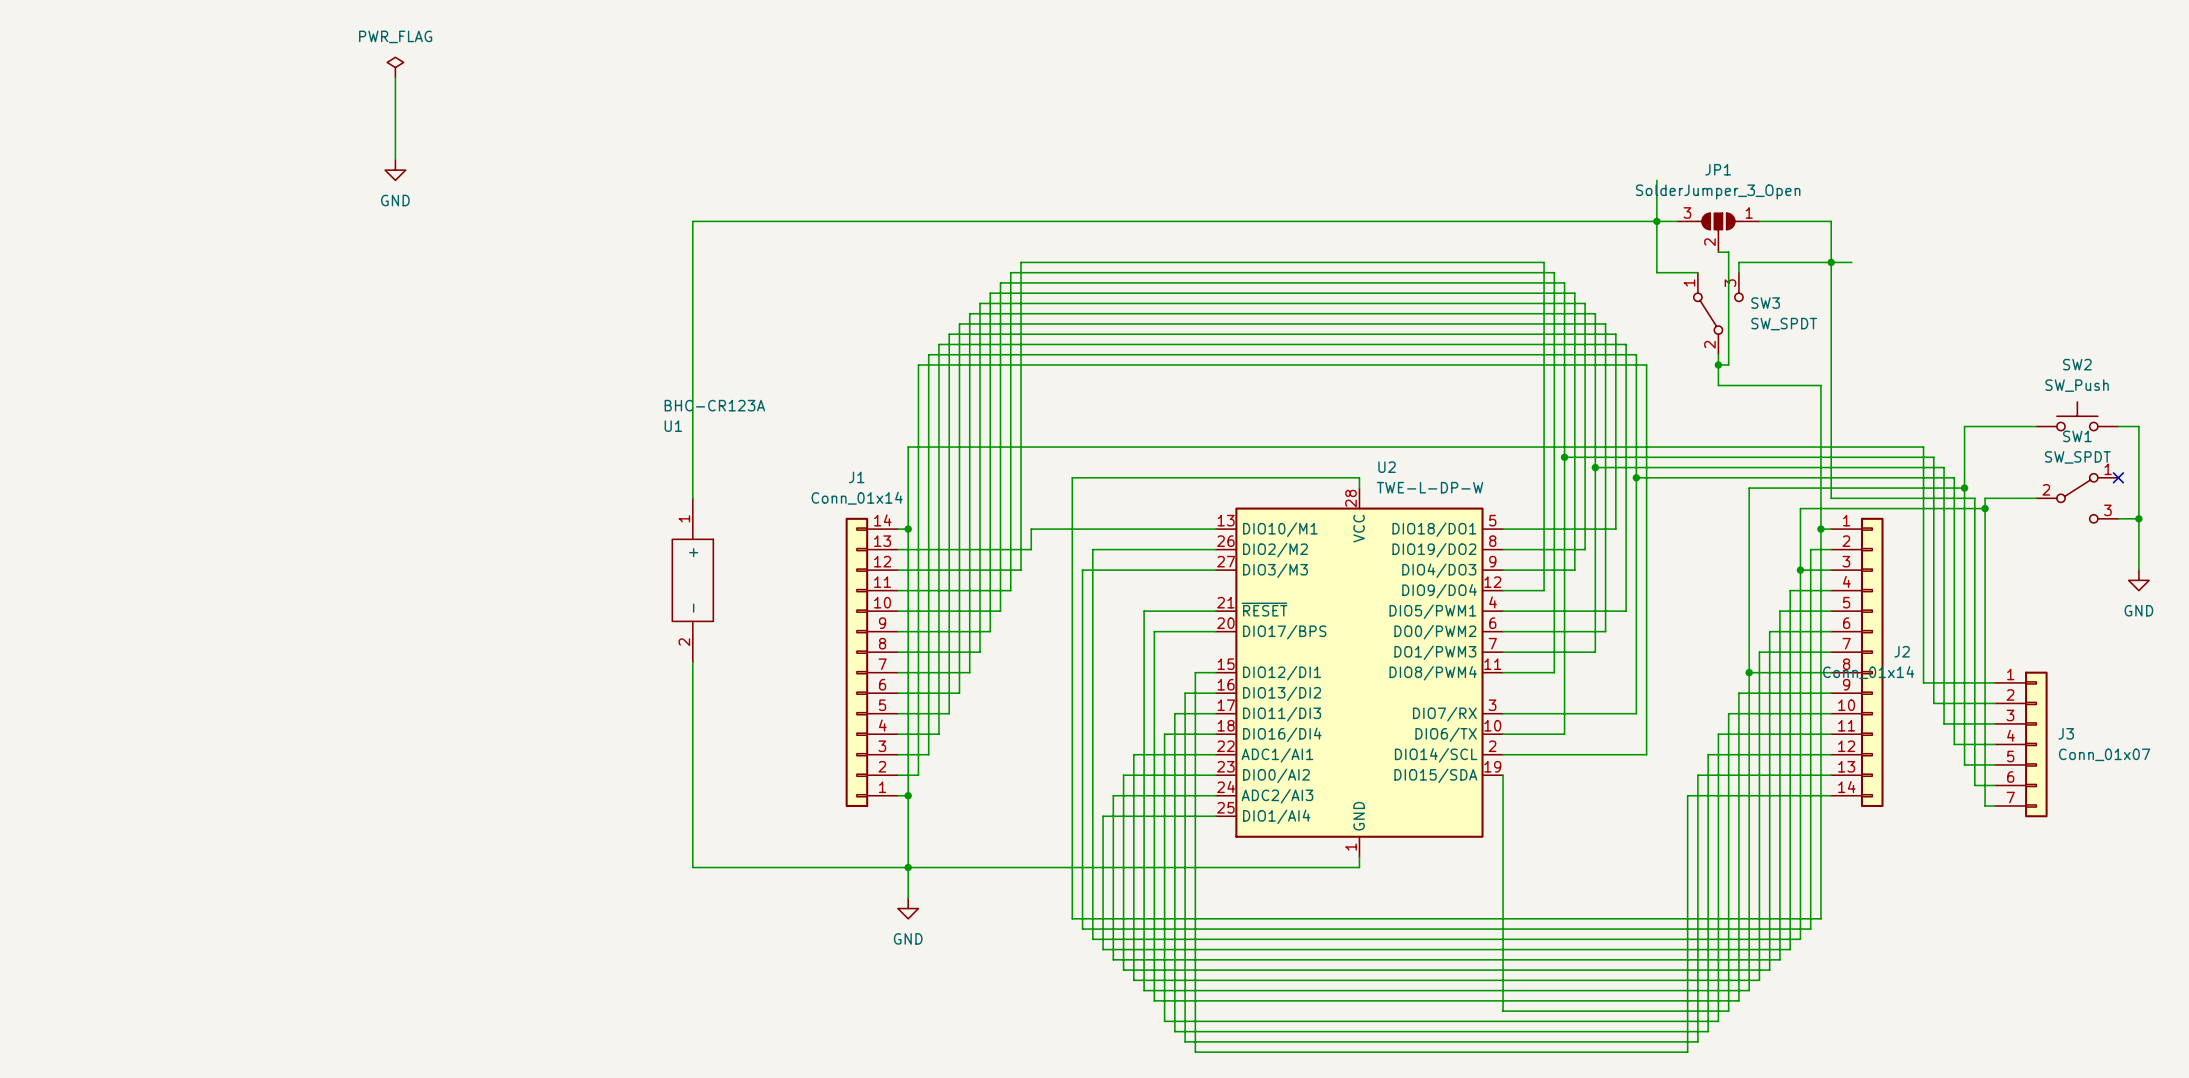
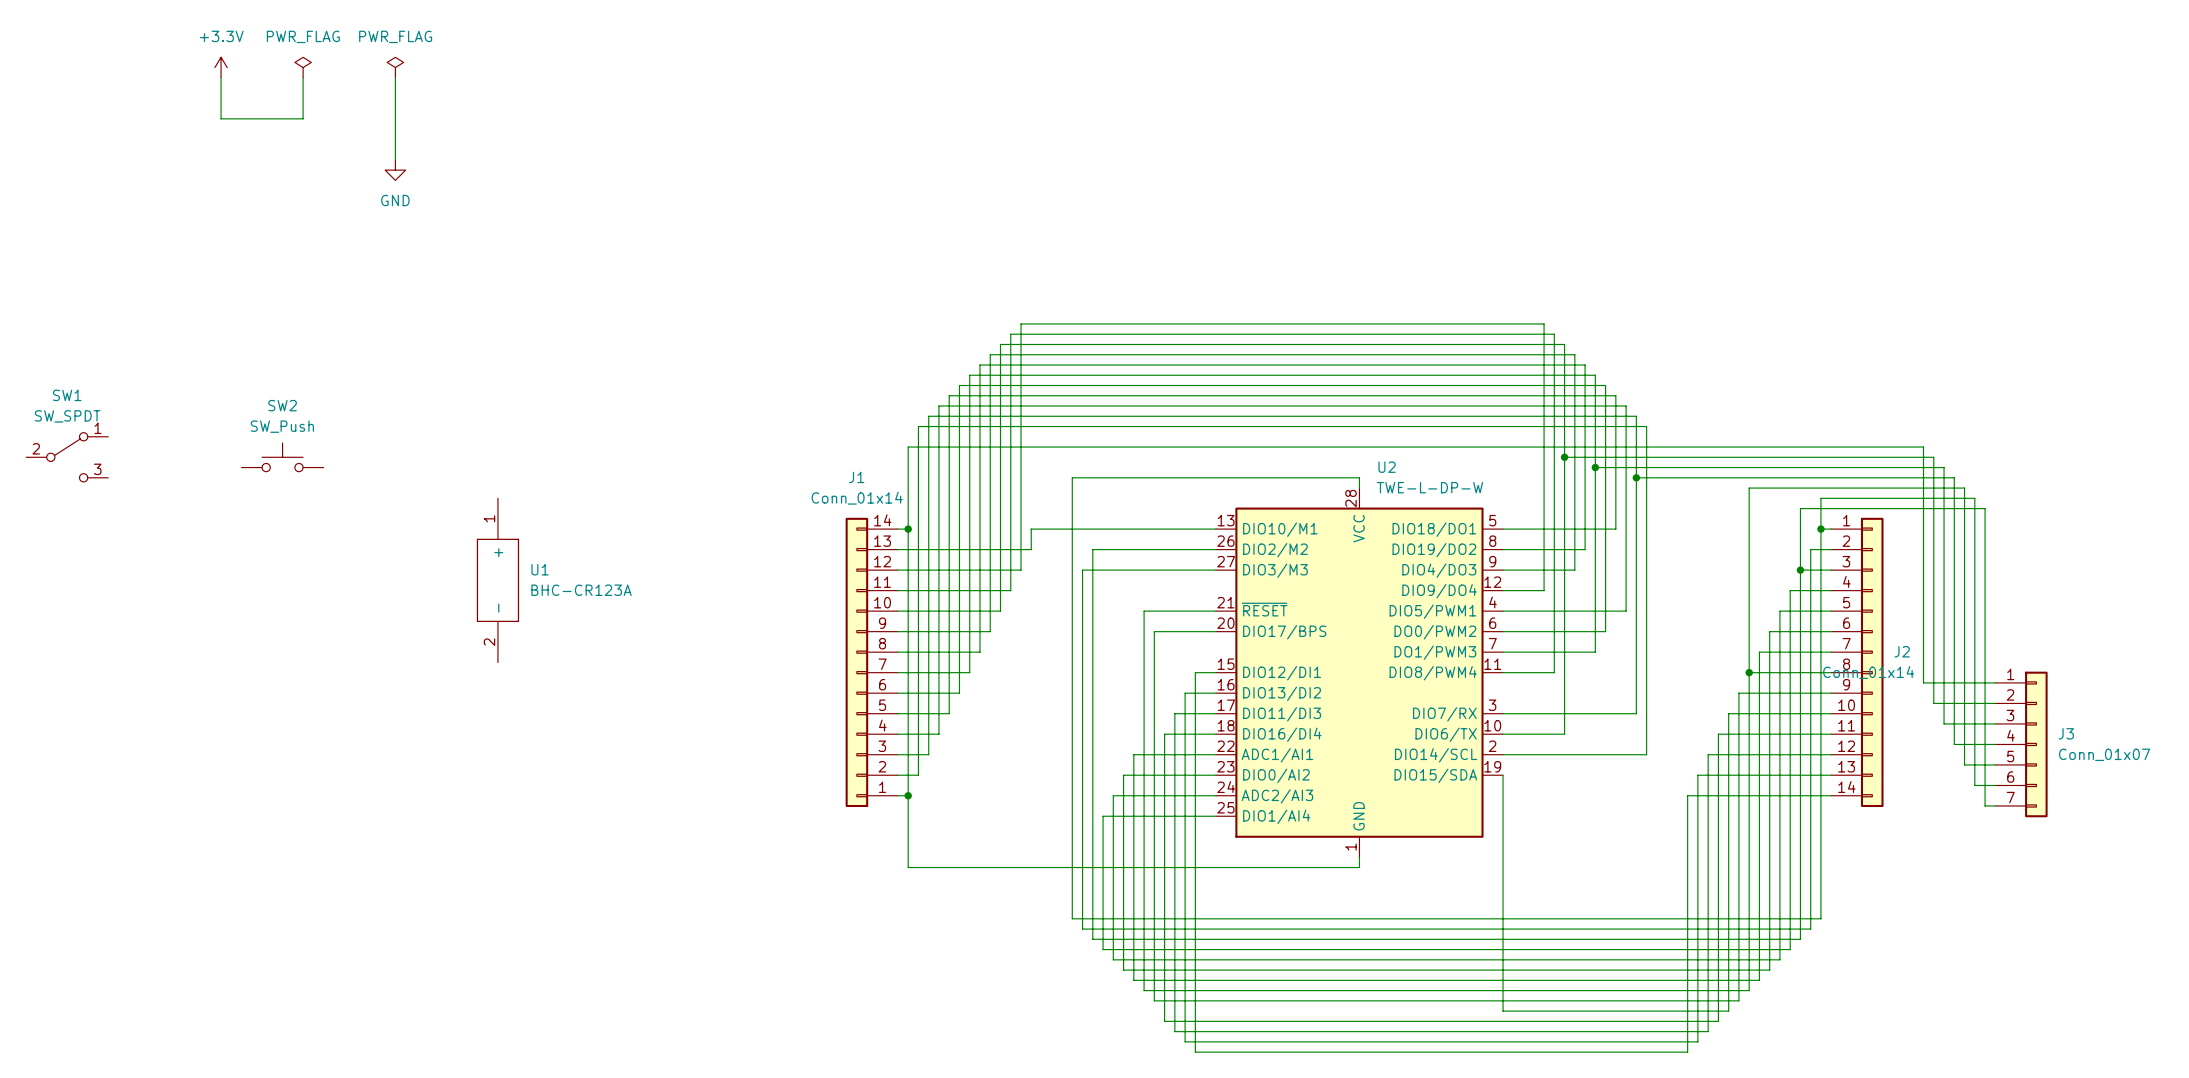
power symbol: none -> +3.3V (221, 67)
power symbol: none -> PWR_FLAG (303, 67)
wire: none -> (221, 77) (221, 118) (303, 118) (303, 77)
wire: (1656, 180) (1656, 272) (1697, 272) -> none
junction: (1656, 221) -> none
wire: (1677, 221) (692, 221) (692, 498) -> none
wire: (1759, 221) (1831, 221) (1831, 498) -> none
JP1: SolderJumper_3_Open (1718, 232) -> none
wire: (1718, 252) (1728, 252) (1728, 364) (1718, 364) -> none
junction: (1831, 262) -> none
wire: (1851, 262) (1738, 262) (1738, 272) -> none
SW3: SW_SPDT (1718, 313) -> none
wire: (1718, 354) (1718, 385) (1820, 385) (1820, 498) -> (1831, 498) (1820, 498)
junction: (1718, 364) -> none
wire: (969, 375) (969, 313) (1595, 313) (1595, 375) -> (969, 375) (1595, 375)
wire: (959, 385) (959, 323) (1021, 323) (1021, 262) (1544, 262) (1544, 323) (1605, 323) (1605, 385) -> (959, 385) (1605, 385)
wire: (949, 395) (949, 334) (1010, 334) (1010, 272) (1554, 272) (1554, 334) (1615, 334) (1615, 395) -> (949, 395) (1615, 395)
U1 value position: BHC-CR123A (714, 405) -> BHC-CR123A (581, 590)
wire: (938, 406) (938, 344) (1000, 344) (1000, 282) (1564, 282) (1564, 344) (1626, 344) (1626, 406) -> (938, 406) (1626, 406)
wire: (928, 416) (928, 354) (990, 354) (990, 293) (1574, 293) (1574, 354) (1636, 354) (1636, 416) -> (928, 416) (1636, 416)
SW2 position: (2077, 416) -> (282, 457)
U1 name position: U1 (673, 426) -> U1 (540, 569)
wire: (918, 426) (918, 364) (979, 364) (979, 303) (1585, 303) (1585, 364) (1646, 364) (1646, 426) -> (918, 426) (1646, 426)
wire: (2036, 426) (1964, 426) (1964, 488) -> none
wire: (2118, 426) (2138, 426) (2138, 570) -> none
no-connect mark: (2118, 477) -> none
junction: (1964, 488) -> none
wire: (2036, 498) (1985, 498) (1985, 508) -> none
SW1 position: (2077, 498) -> (67, 457)
junction: (1985, 508) -> none
wire: (2118, 518) (2138, 518) -> none
junction: (2138, 518) -> none
U1 position: (692, 580) -> (497, 580)
power symbol: GND (2138, 580) -> none
wire: (692, 662) (692, 867) (908, 867) (908, 898) -> none
junction: (908, 867) -> none
power symbol: GND (908, 908) -> none

